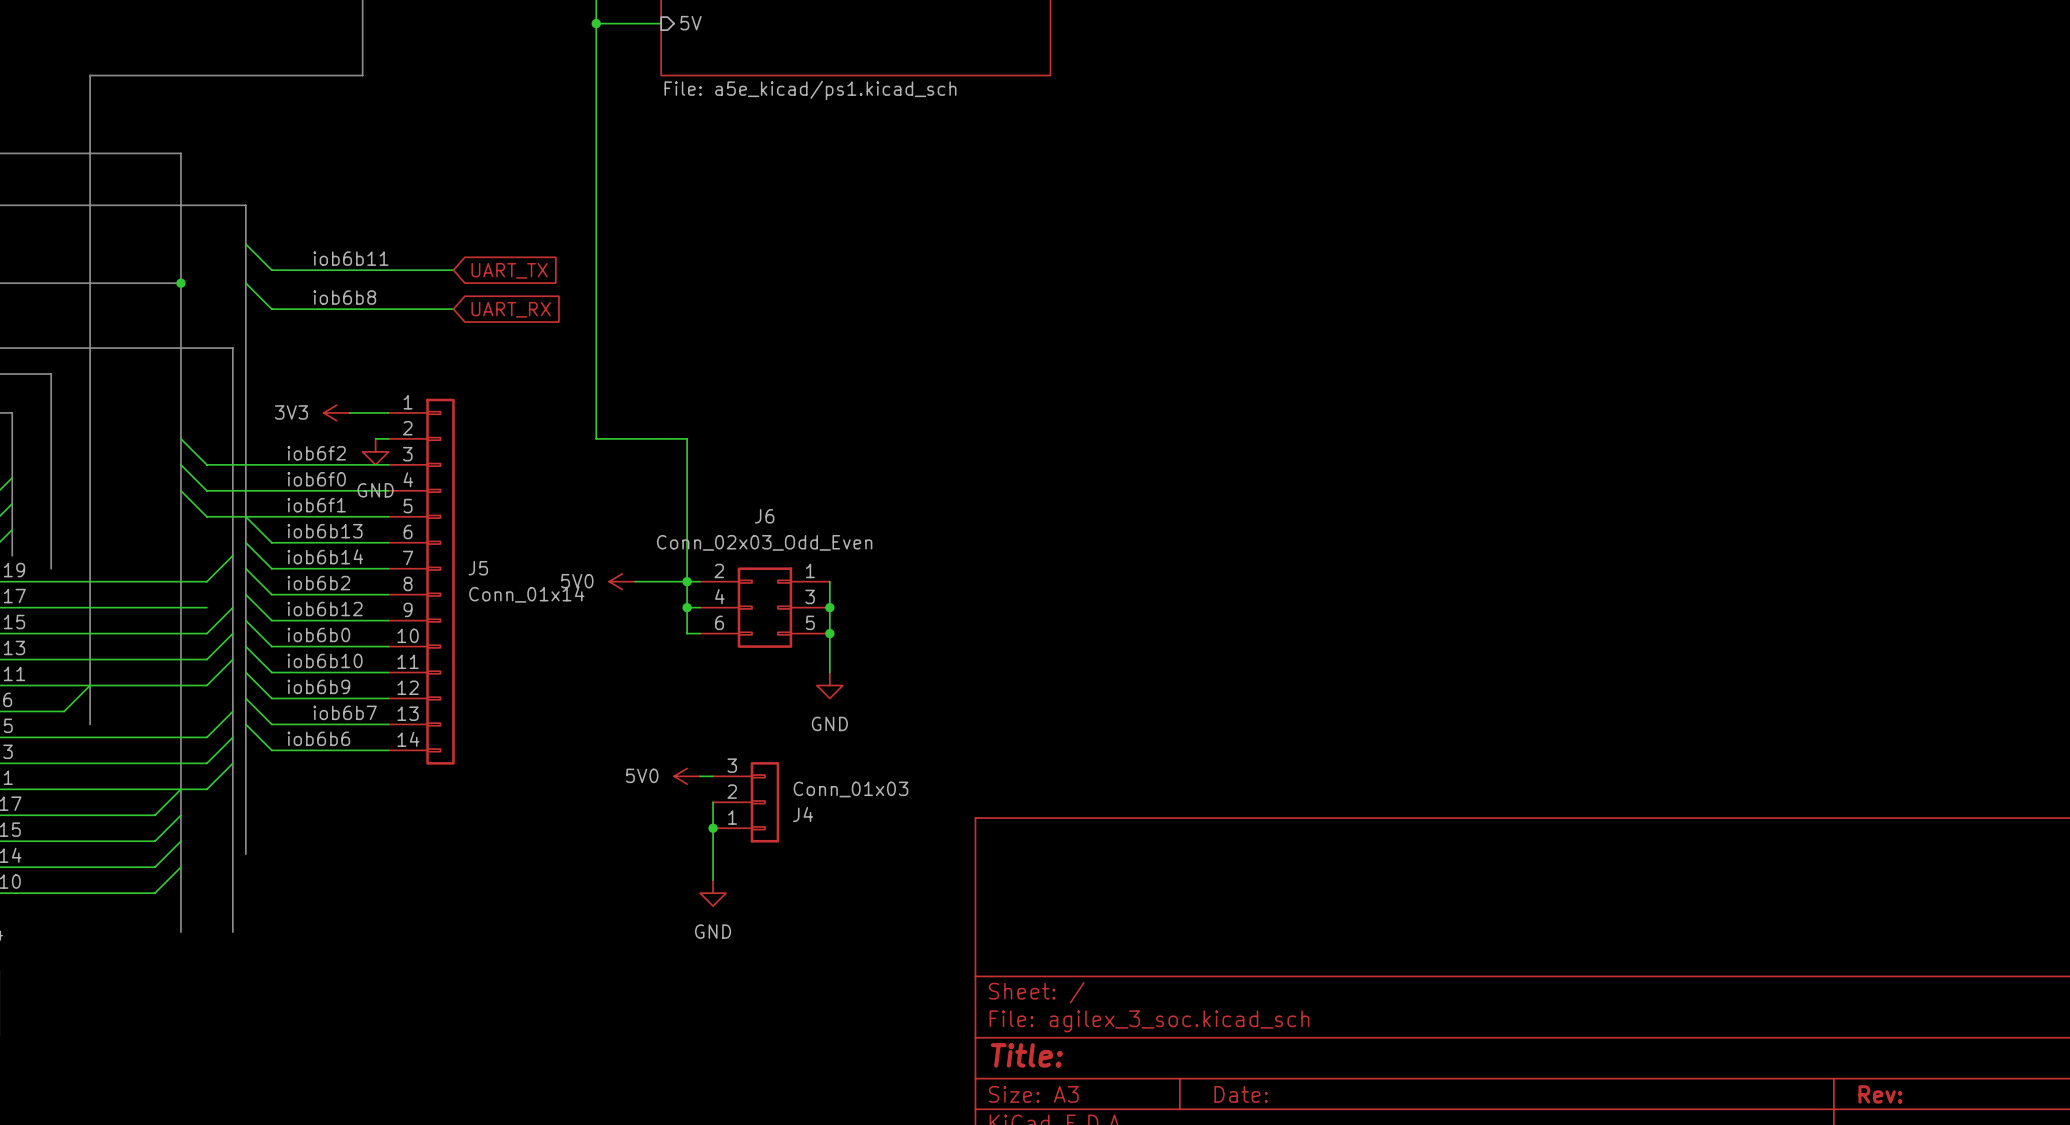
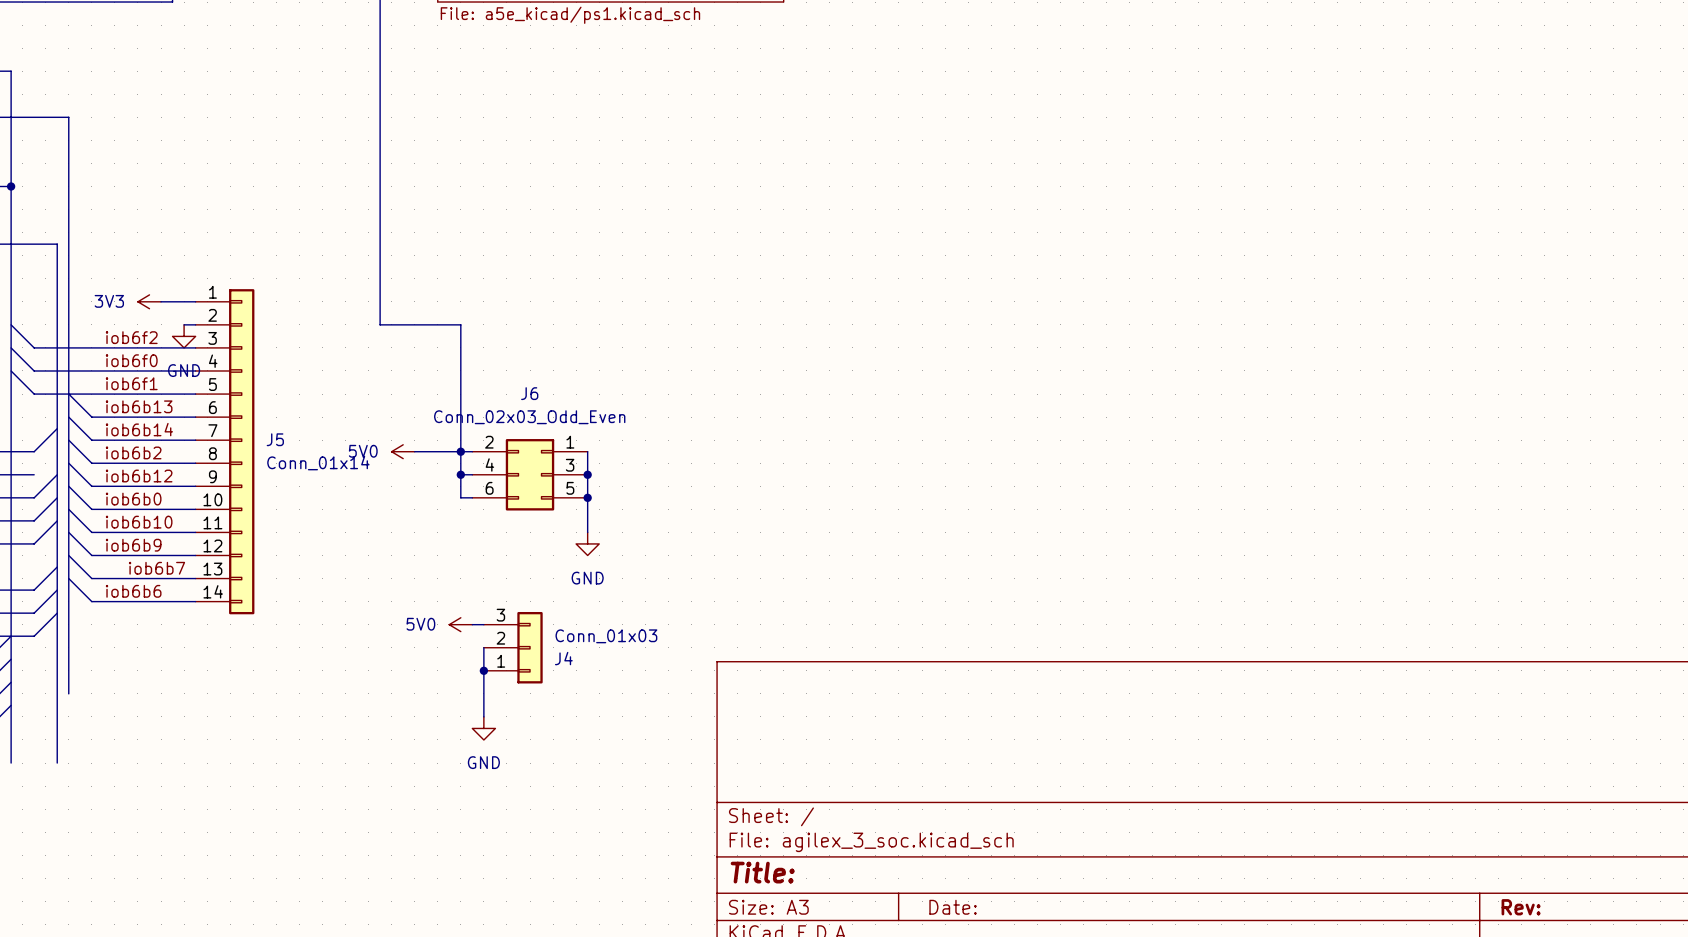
wire: (245, 244) (271, 270) (453, 270) -> none
label: iob6b11 (351, 258) -> none
global label: UART_TX (509, 270) -> none
wire: (245, 283) (271, 309) (453, 309) -> none
label: iob6b8 (344, 297) -> none
global label: UART_RX (511, 309) -> none

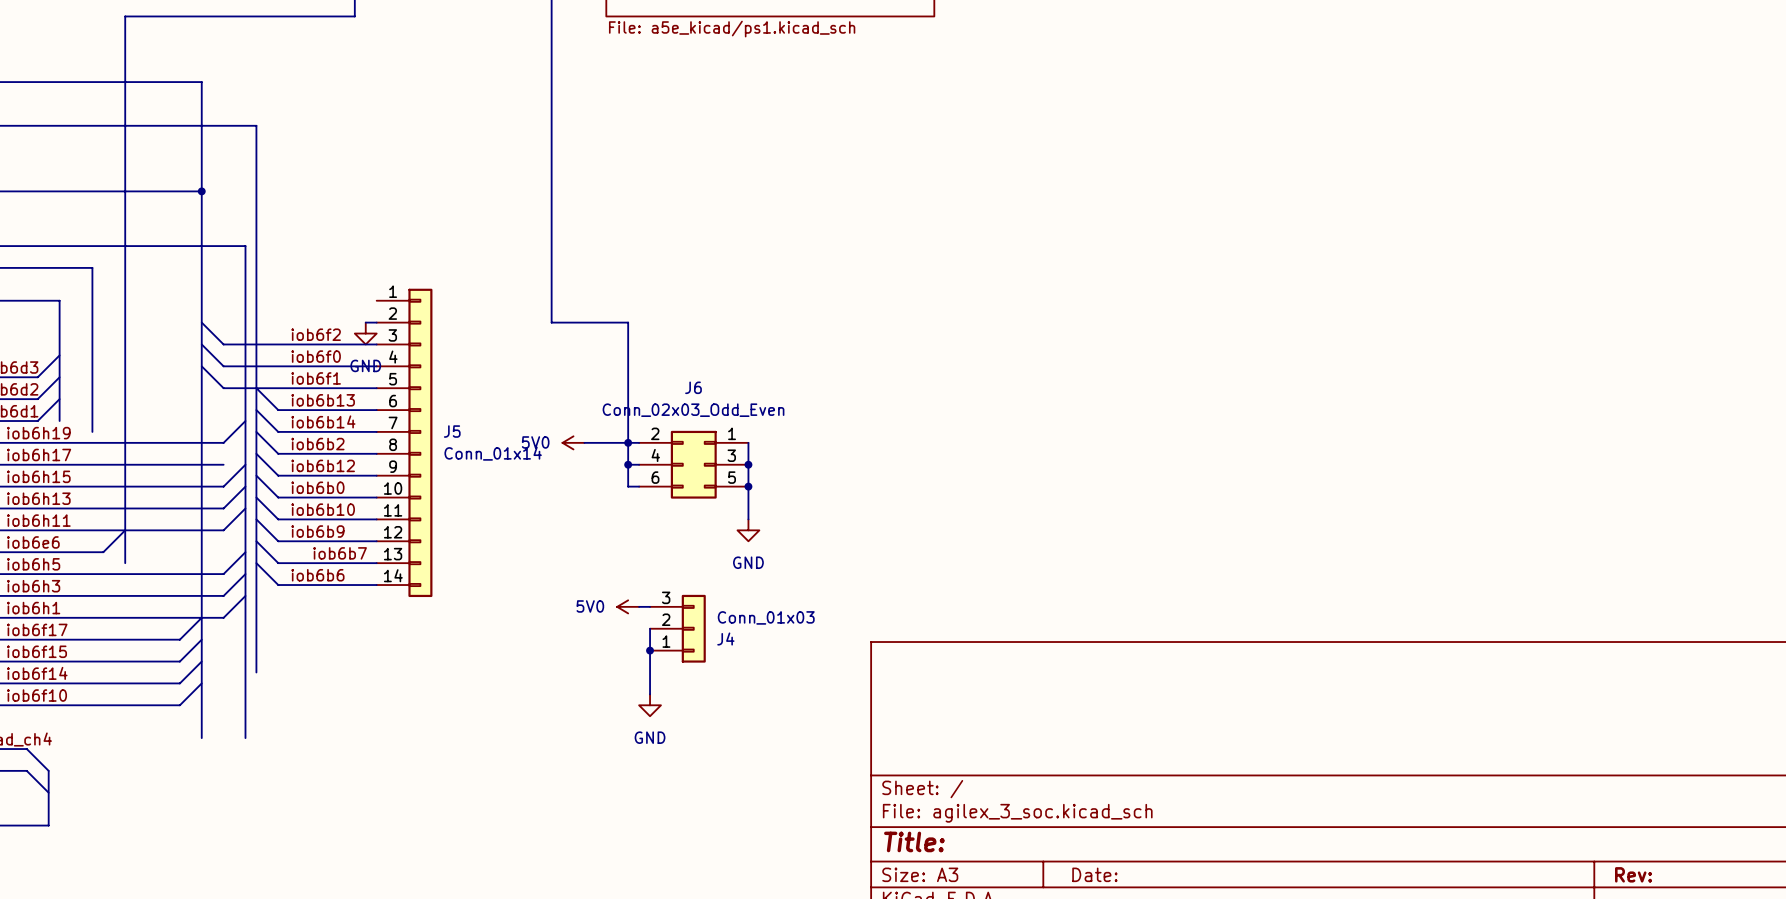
power symbol: 3V3 (149, 301) -> none
wire: (161, 301) (195, 301) -> none

